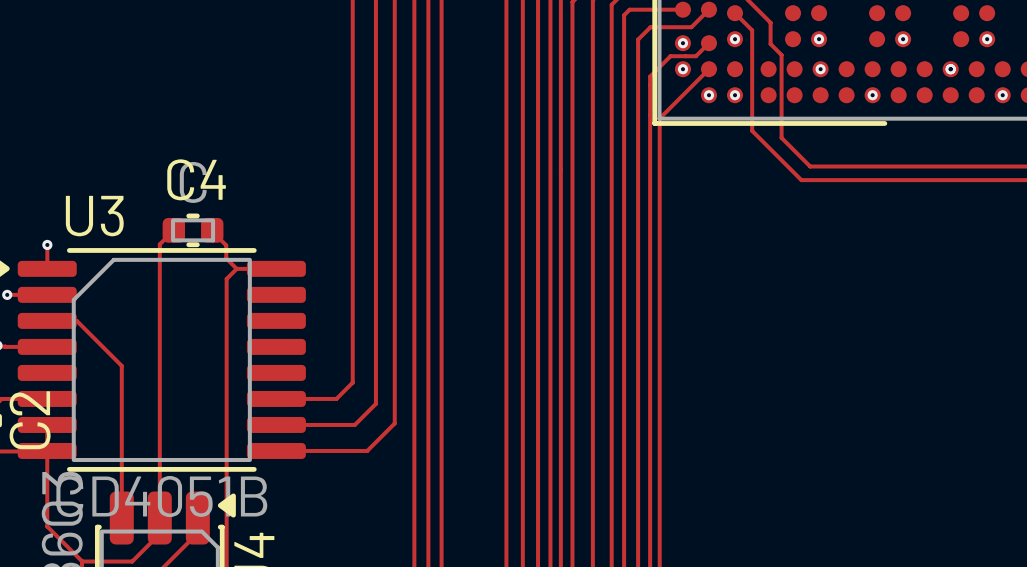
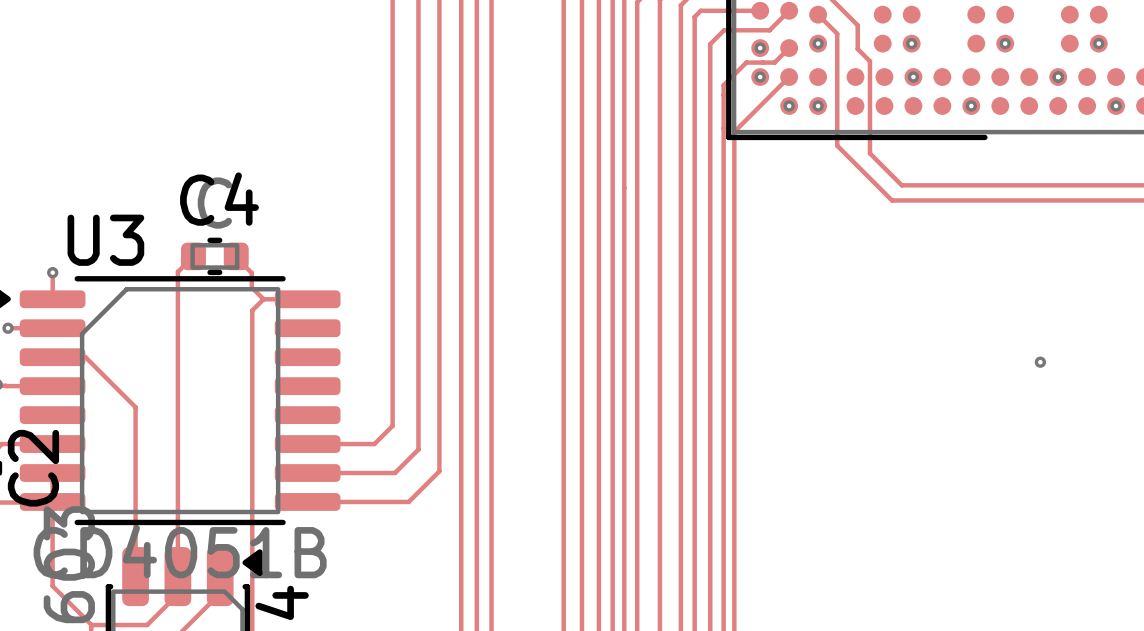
via: none -> (1040, 362)

